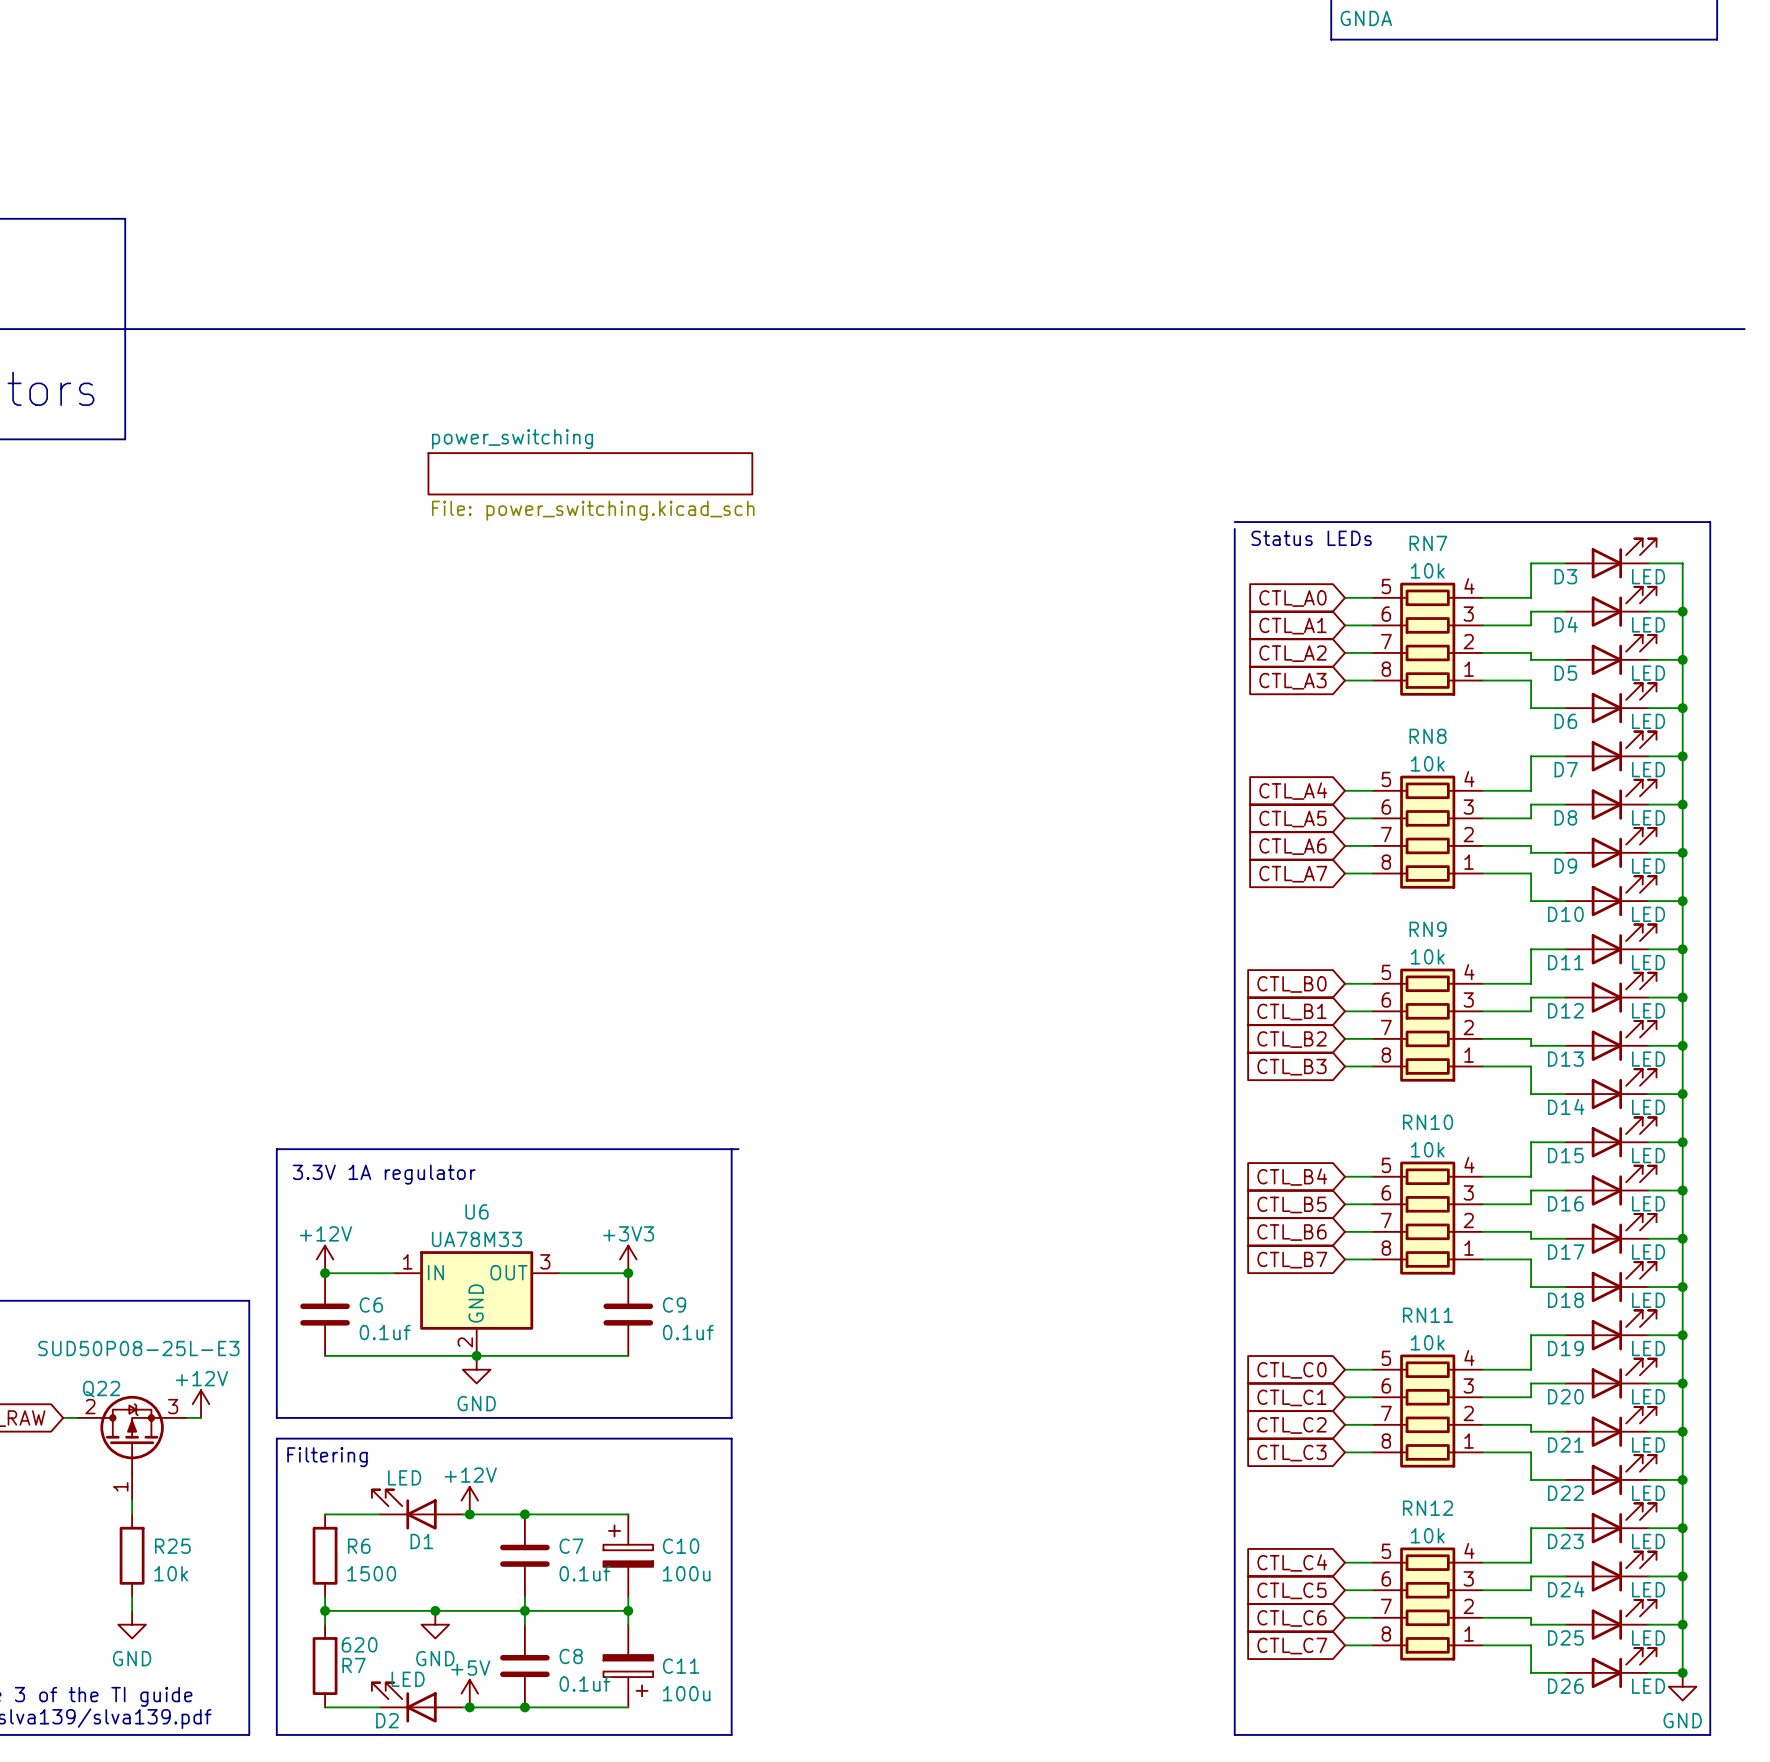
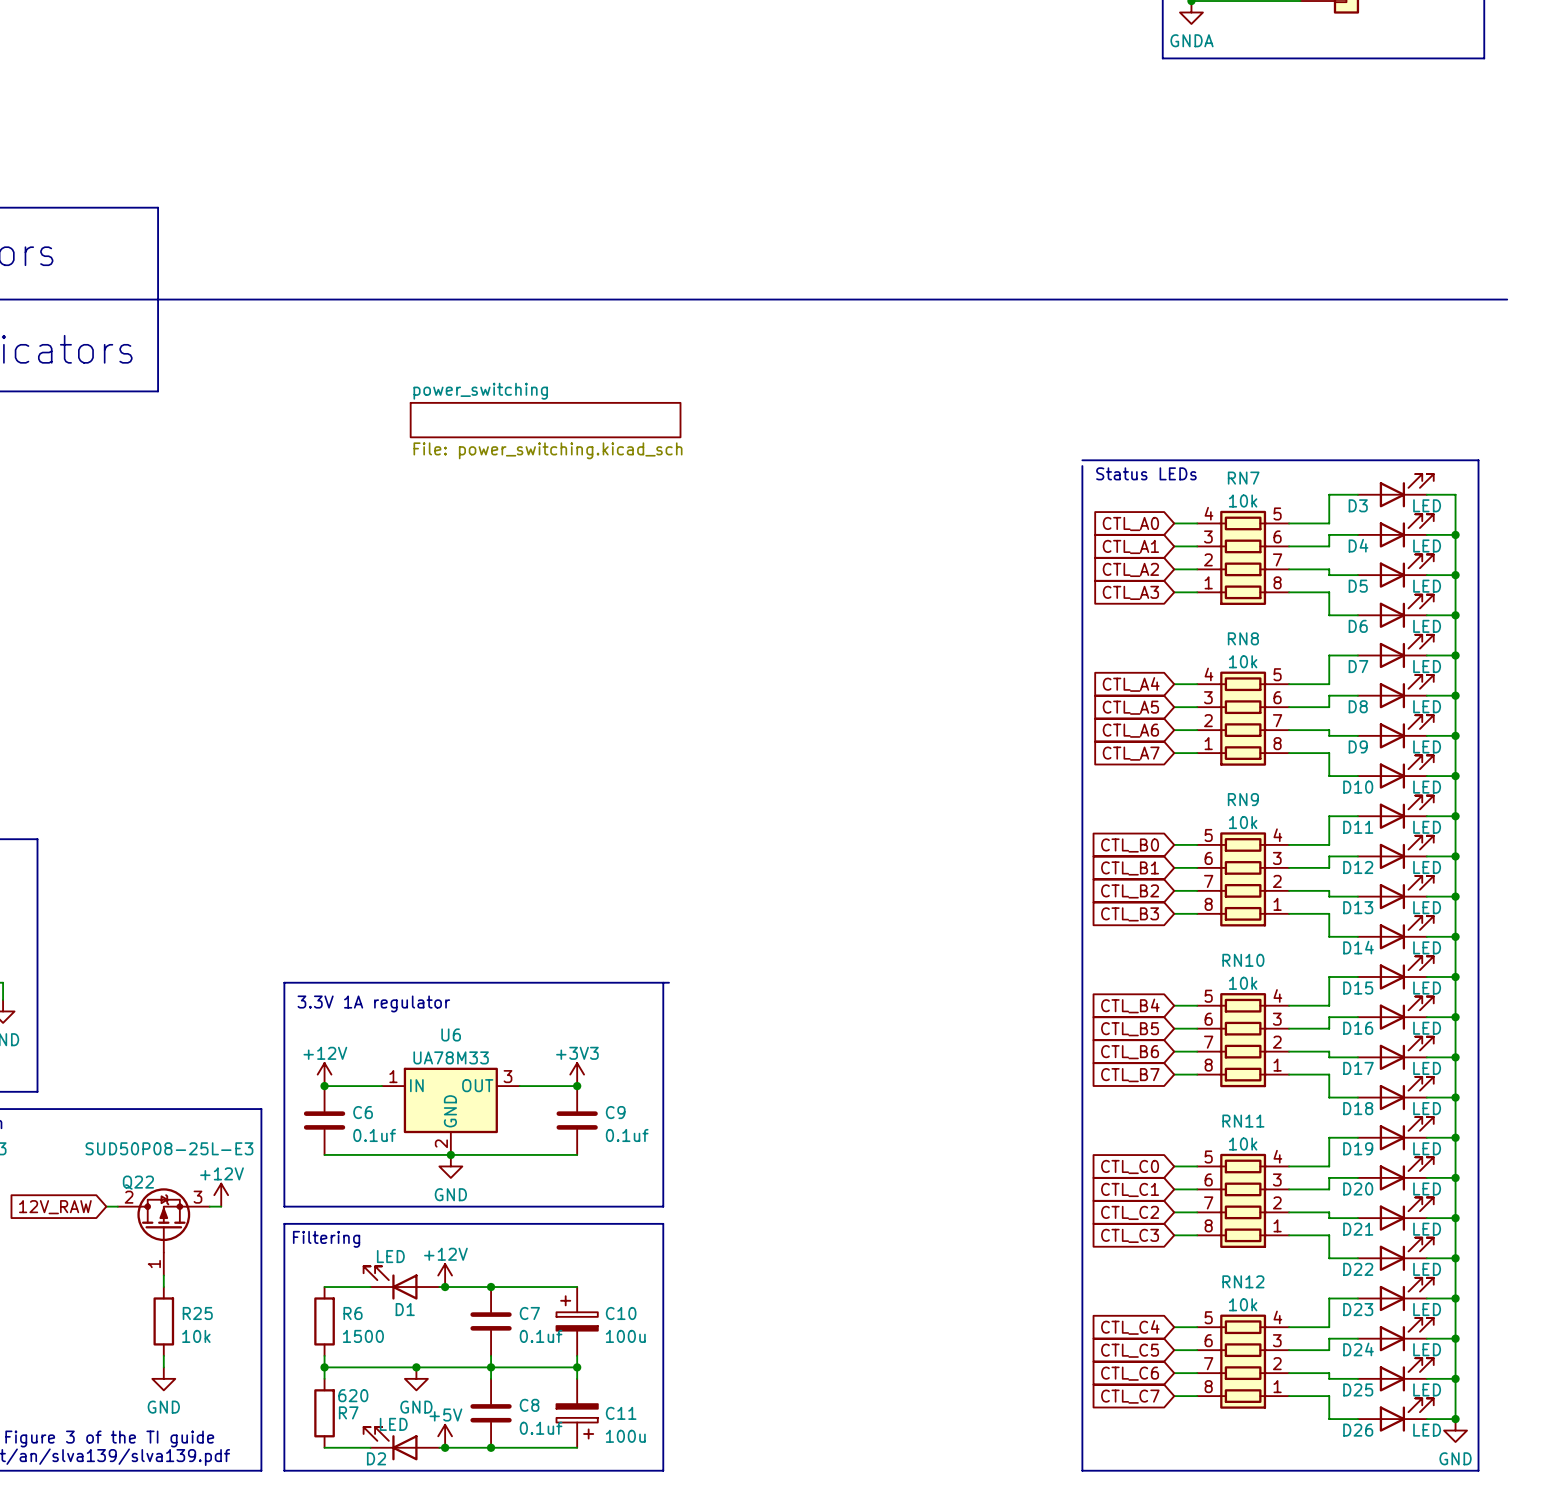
RN7 flip: as is (1427, 639) -> left-right (1243, 557)
RN8 flip: as is (1427, 832) -> left-right (1243, 718)

